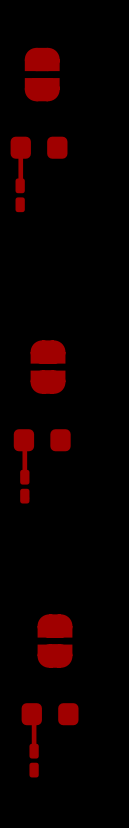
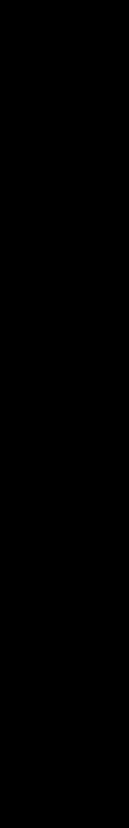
part: (42, 74) -> none
top track: (20, 147) (20, 185) -> none
part: (39, 147) -> none
part: (20, 195) -> none
part: (48, 367) -> none
top track: (23, 440) (24, 477) -> none
part: (42, 440) -> none
part: (24, 486) -> none
part: (55, 641) -> none
top track: (31, 714) (34, 716) (34, 751) -> none
part: (50, 714) -> none
part: (34, 760) -> none

